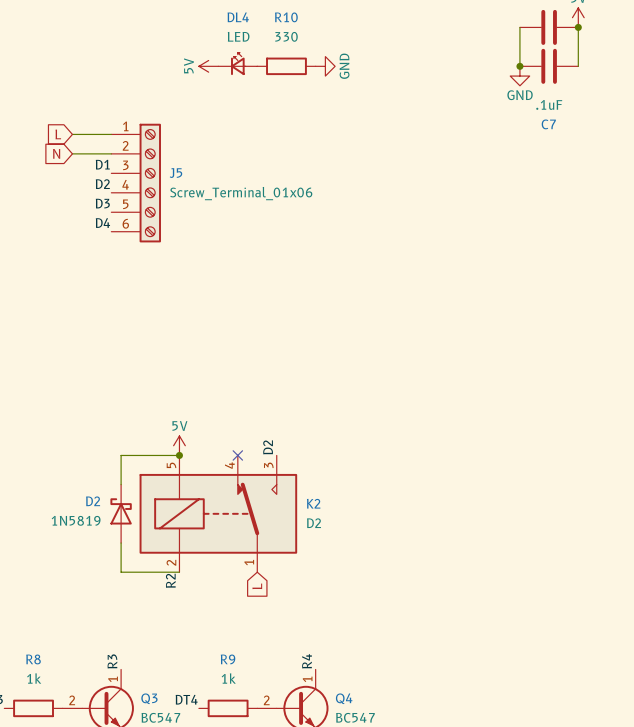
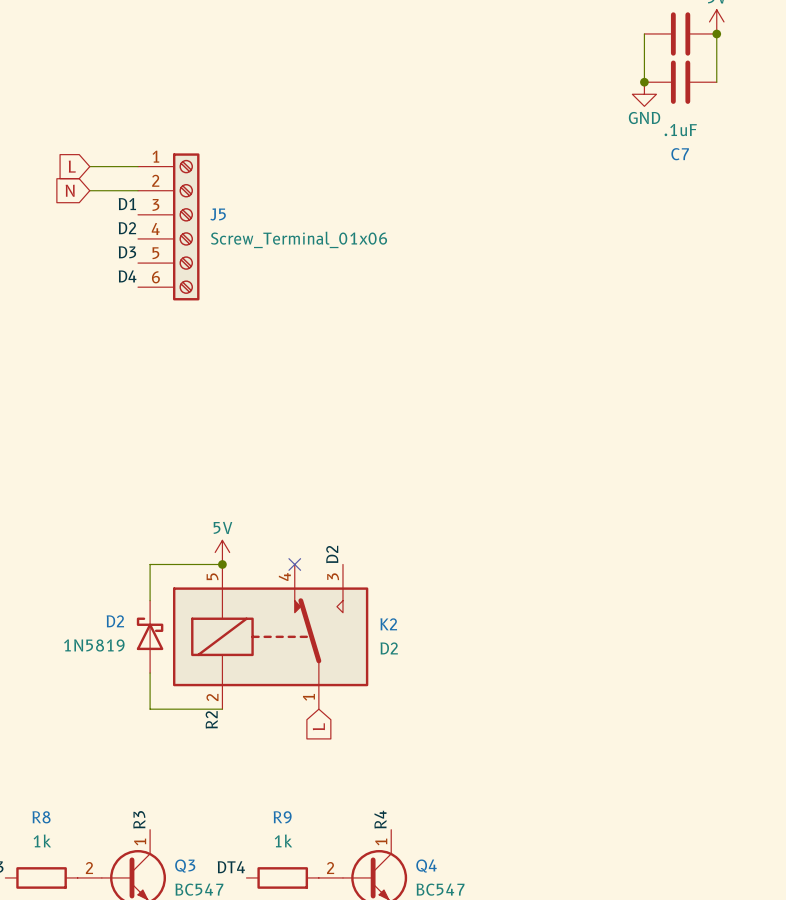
DL4: LED (237, 63) -> none
power symbol: 5V (208, 66) -> none
R10: 330 (286, 66) -> none
power symbol: GND (325, 66) -> none

